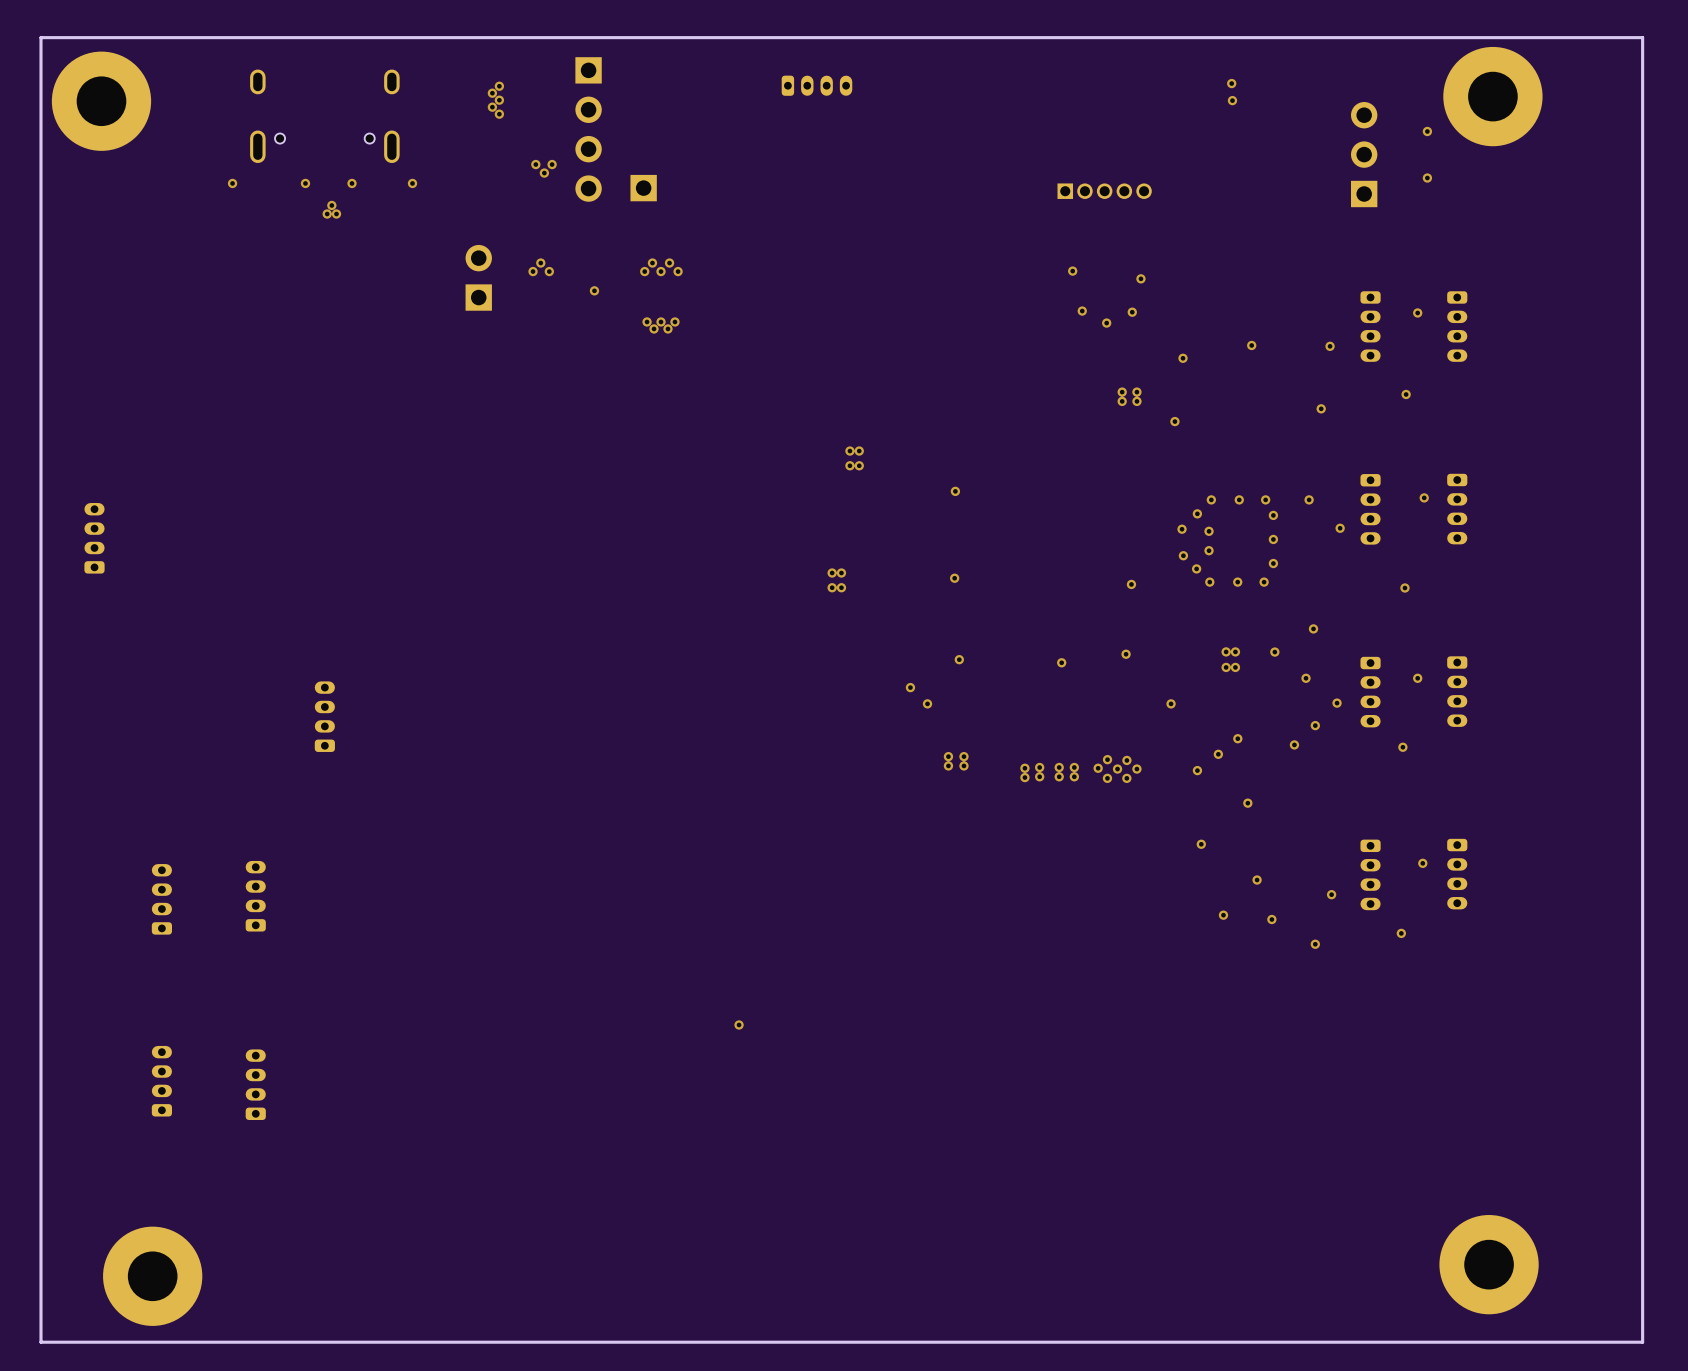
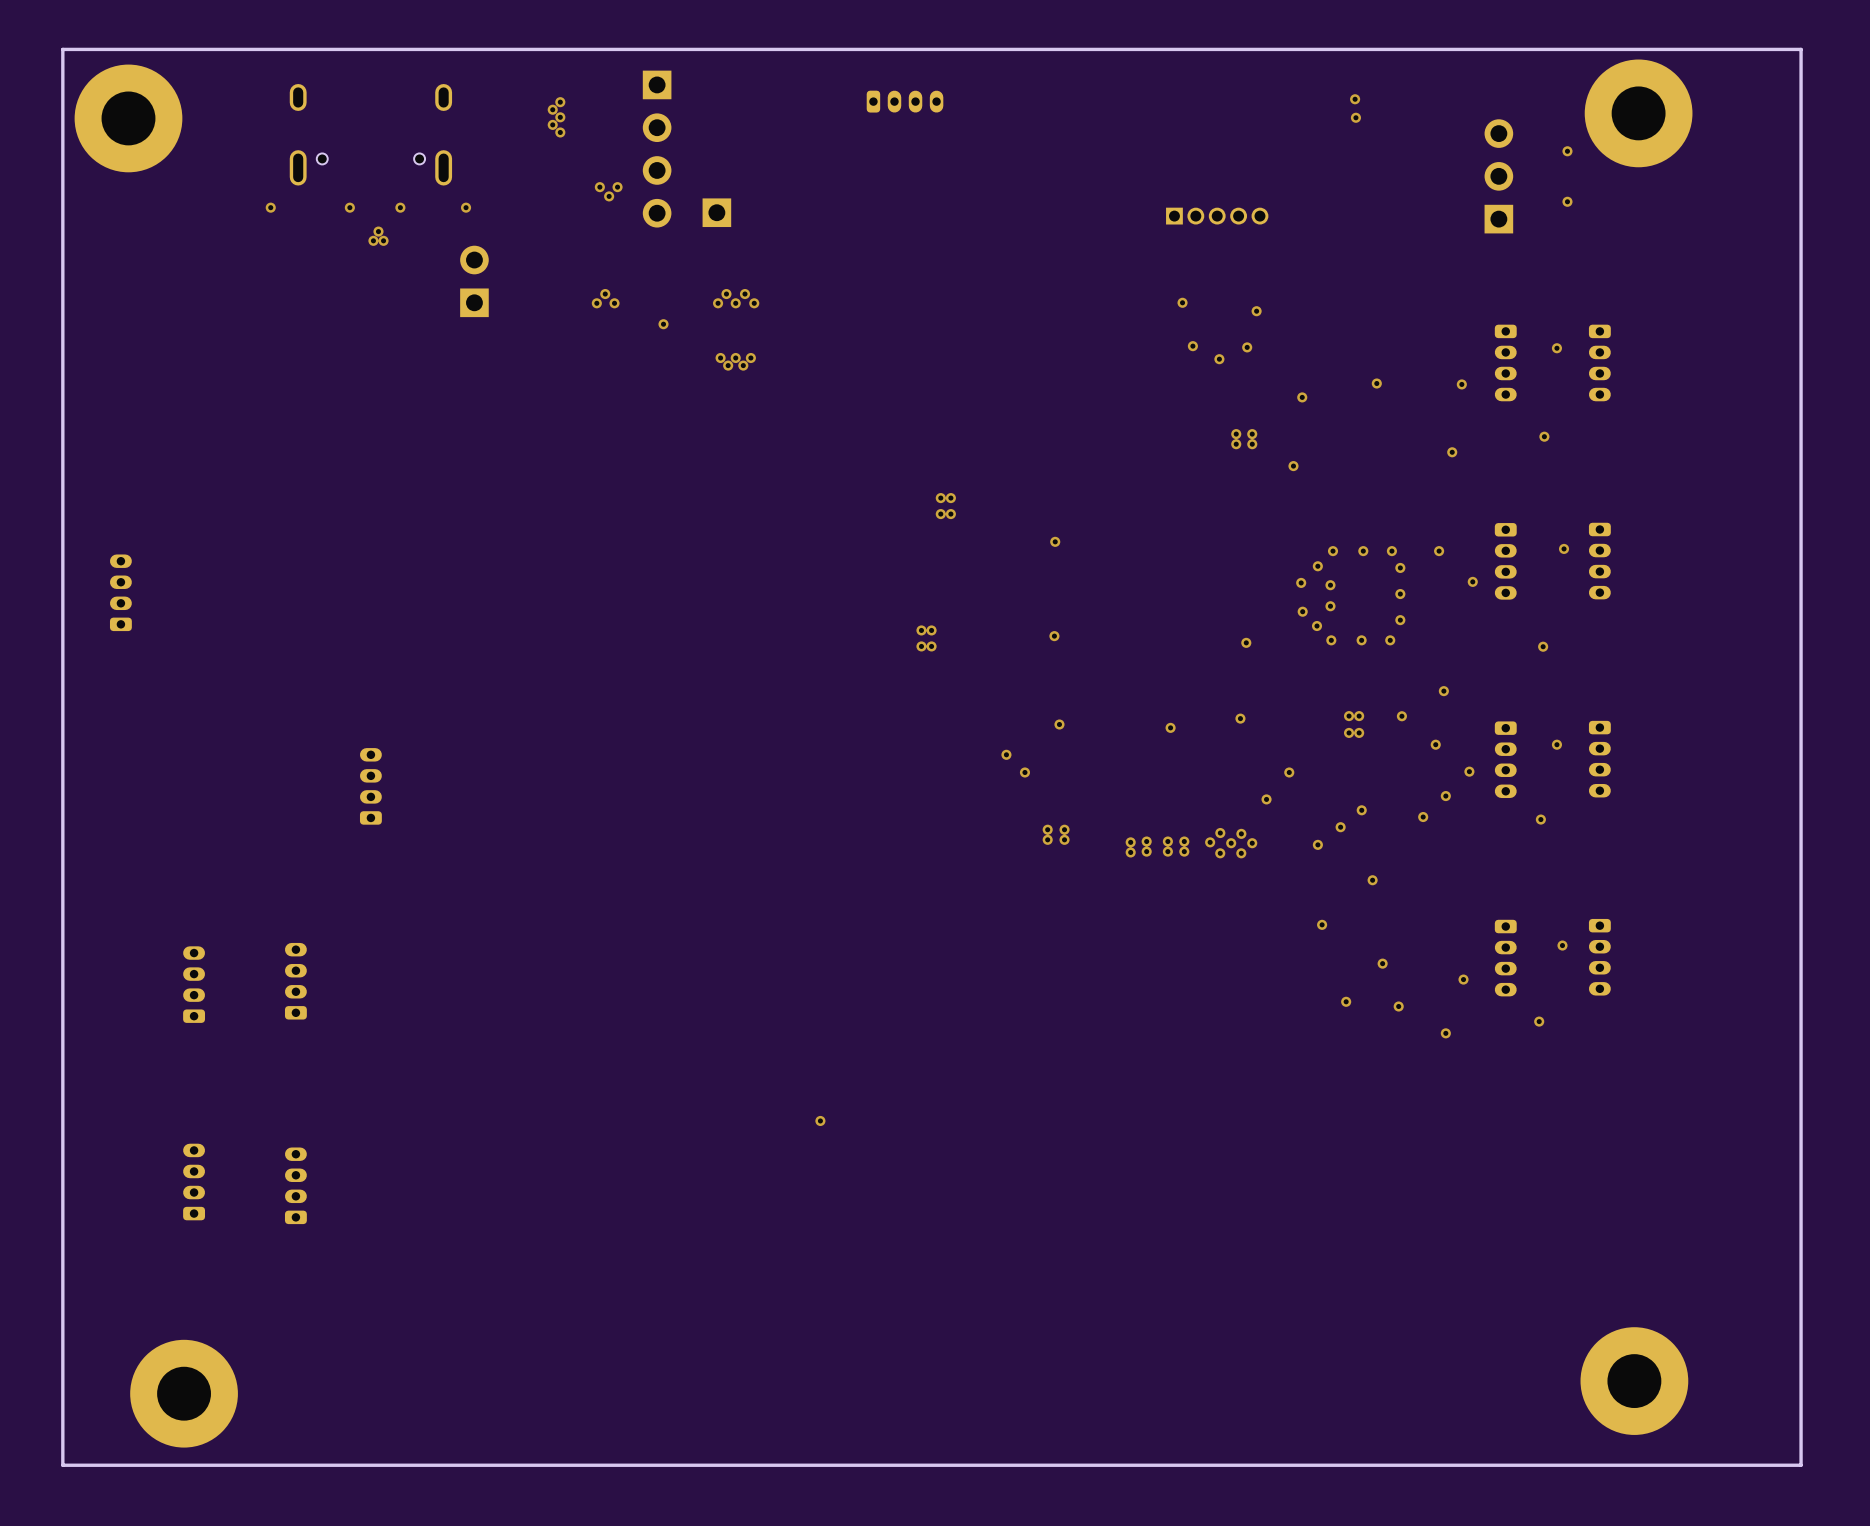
part position: (478, 277) -> (474, 281)
via: none -> (1266, 799)

